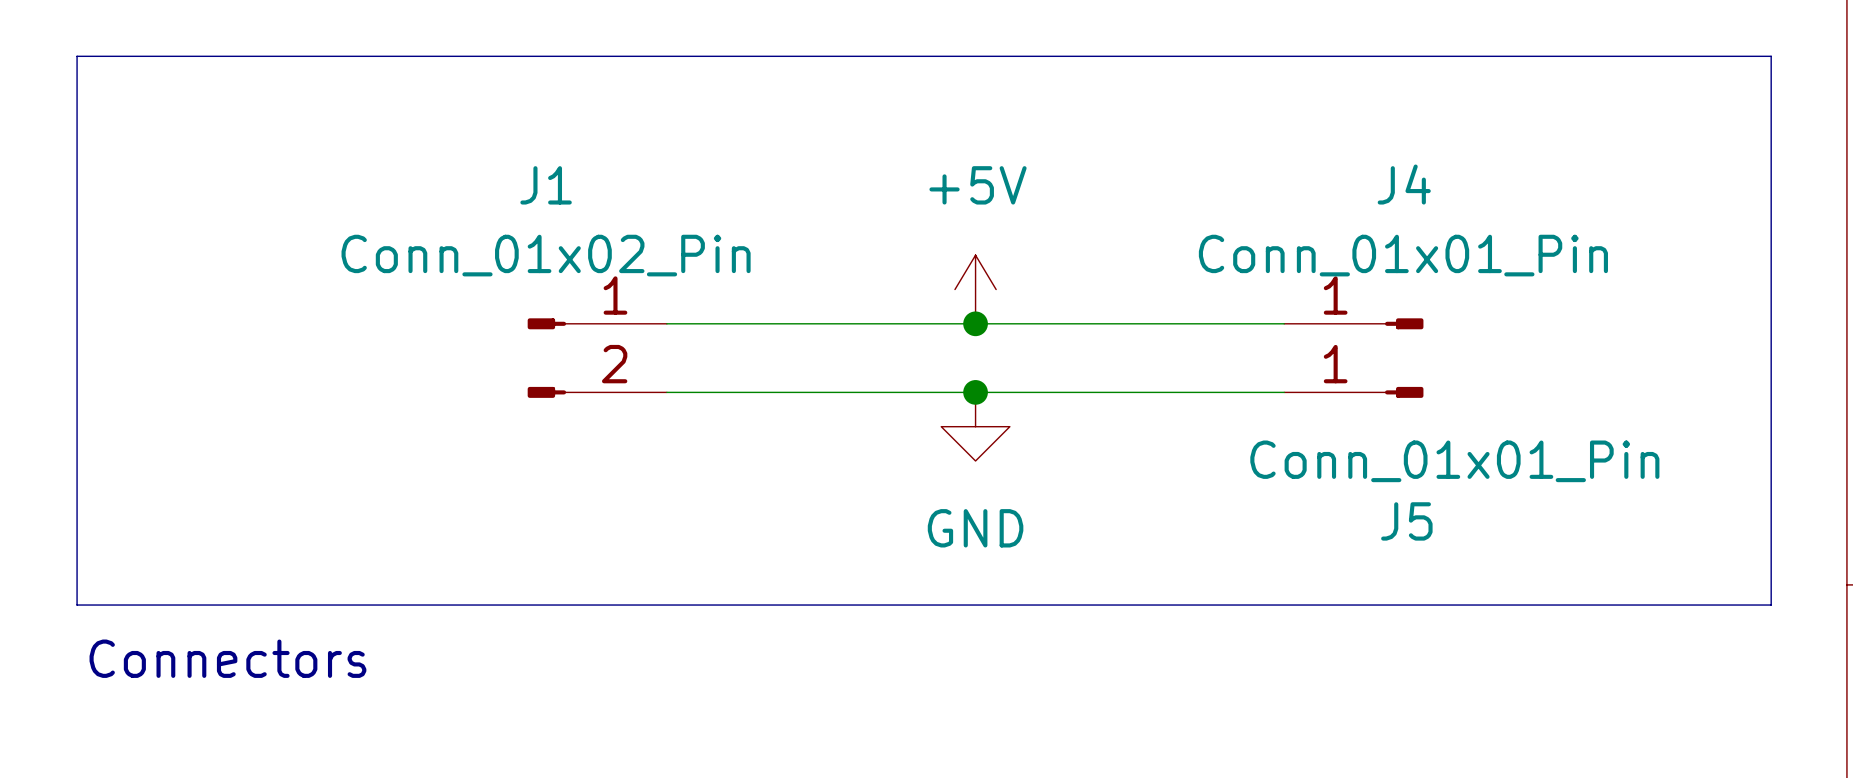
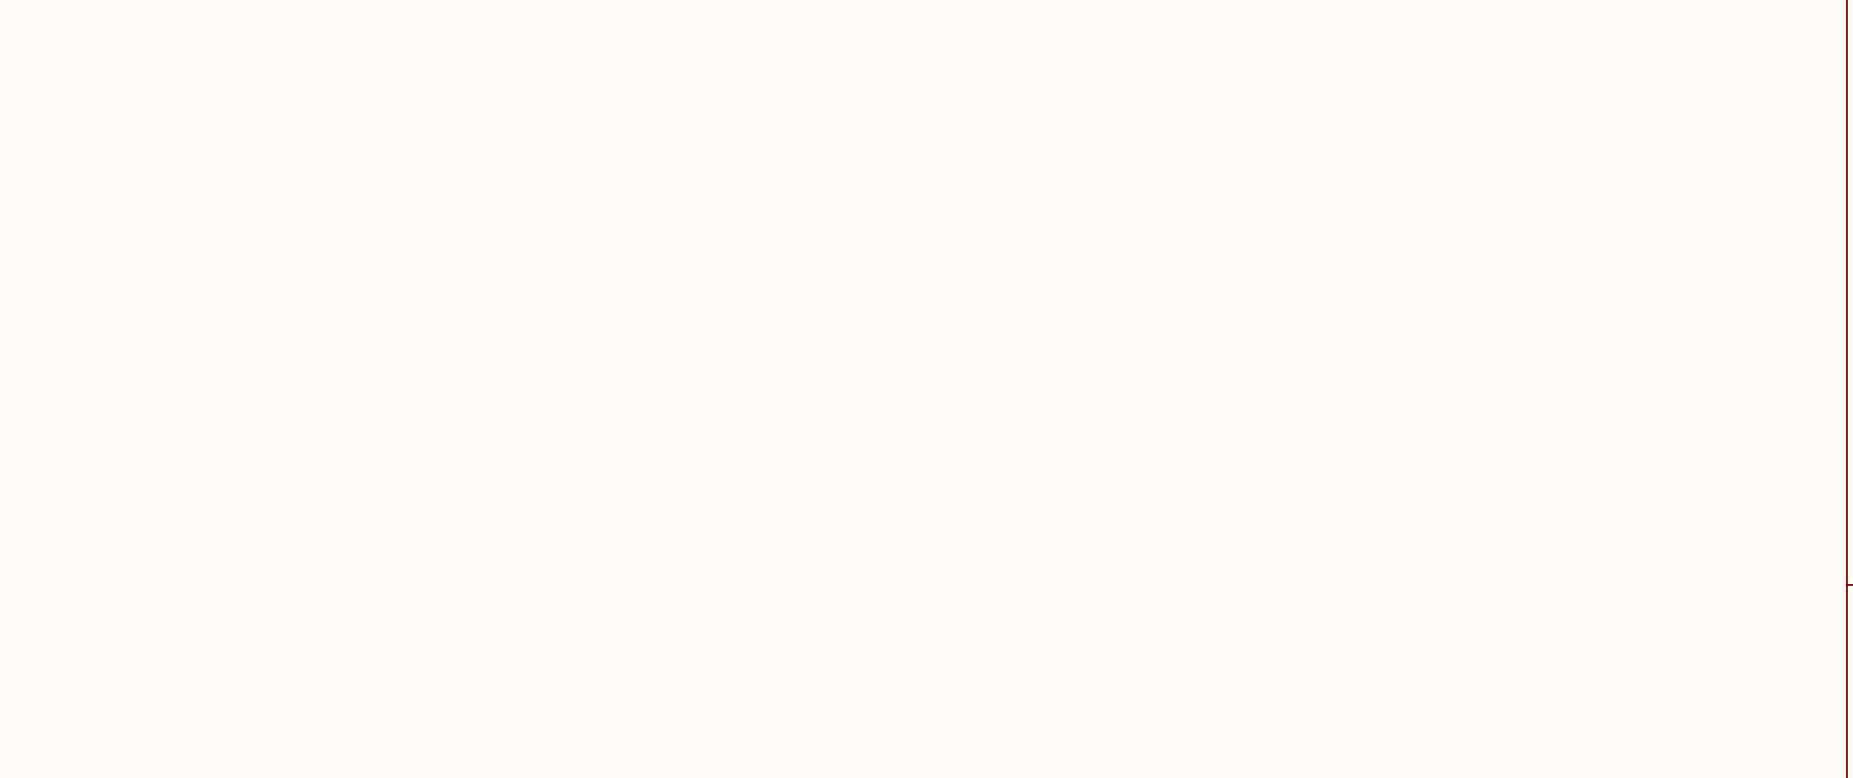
line: (77, 56) (1771, 56) (1771, 605) (77, 605) (77, 56) -> none
power symbol: +5V (975, 289) -> none
wire: (666, 323) (1284, 323) -> none
junction: (975, 323) -> none
J4: Conn_01x01_Pin (1353, 323) -> none
J1: Conn_01x02_Pin (597, 358) -> none
wire: (666, 392) (1284, 392) -> none
junction: (975, 392) -> none
J5: Conn_01x01_Pin (1353, 392) -> none
power symbol: GND (975, 426) -> none
text: Connectors (227, 658) -> none

